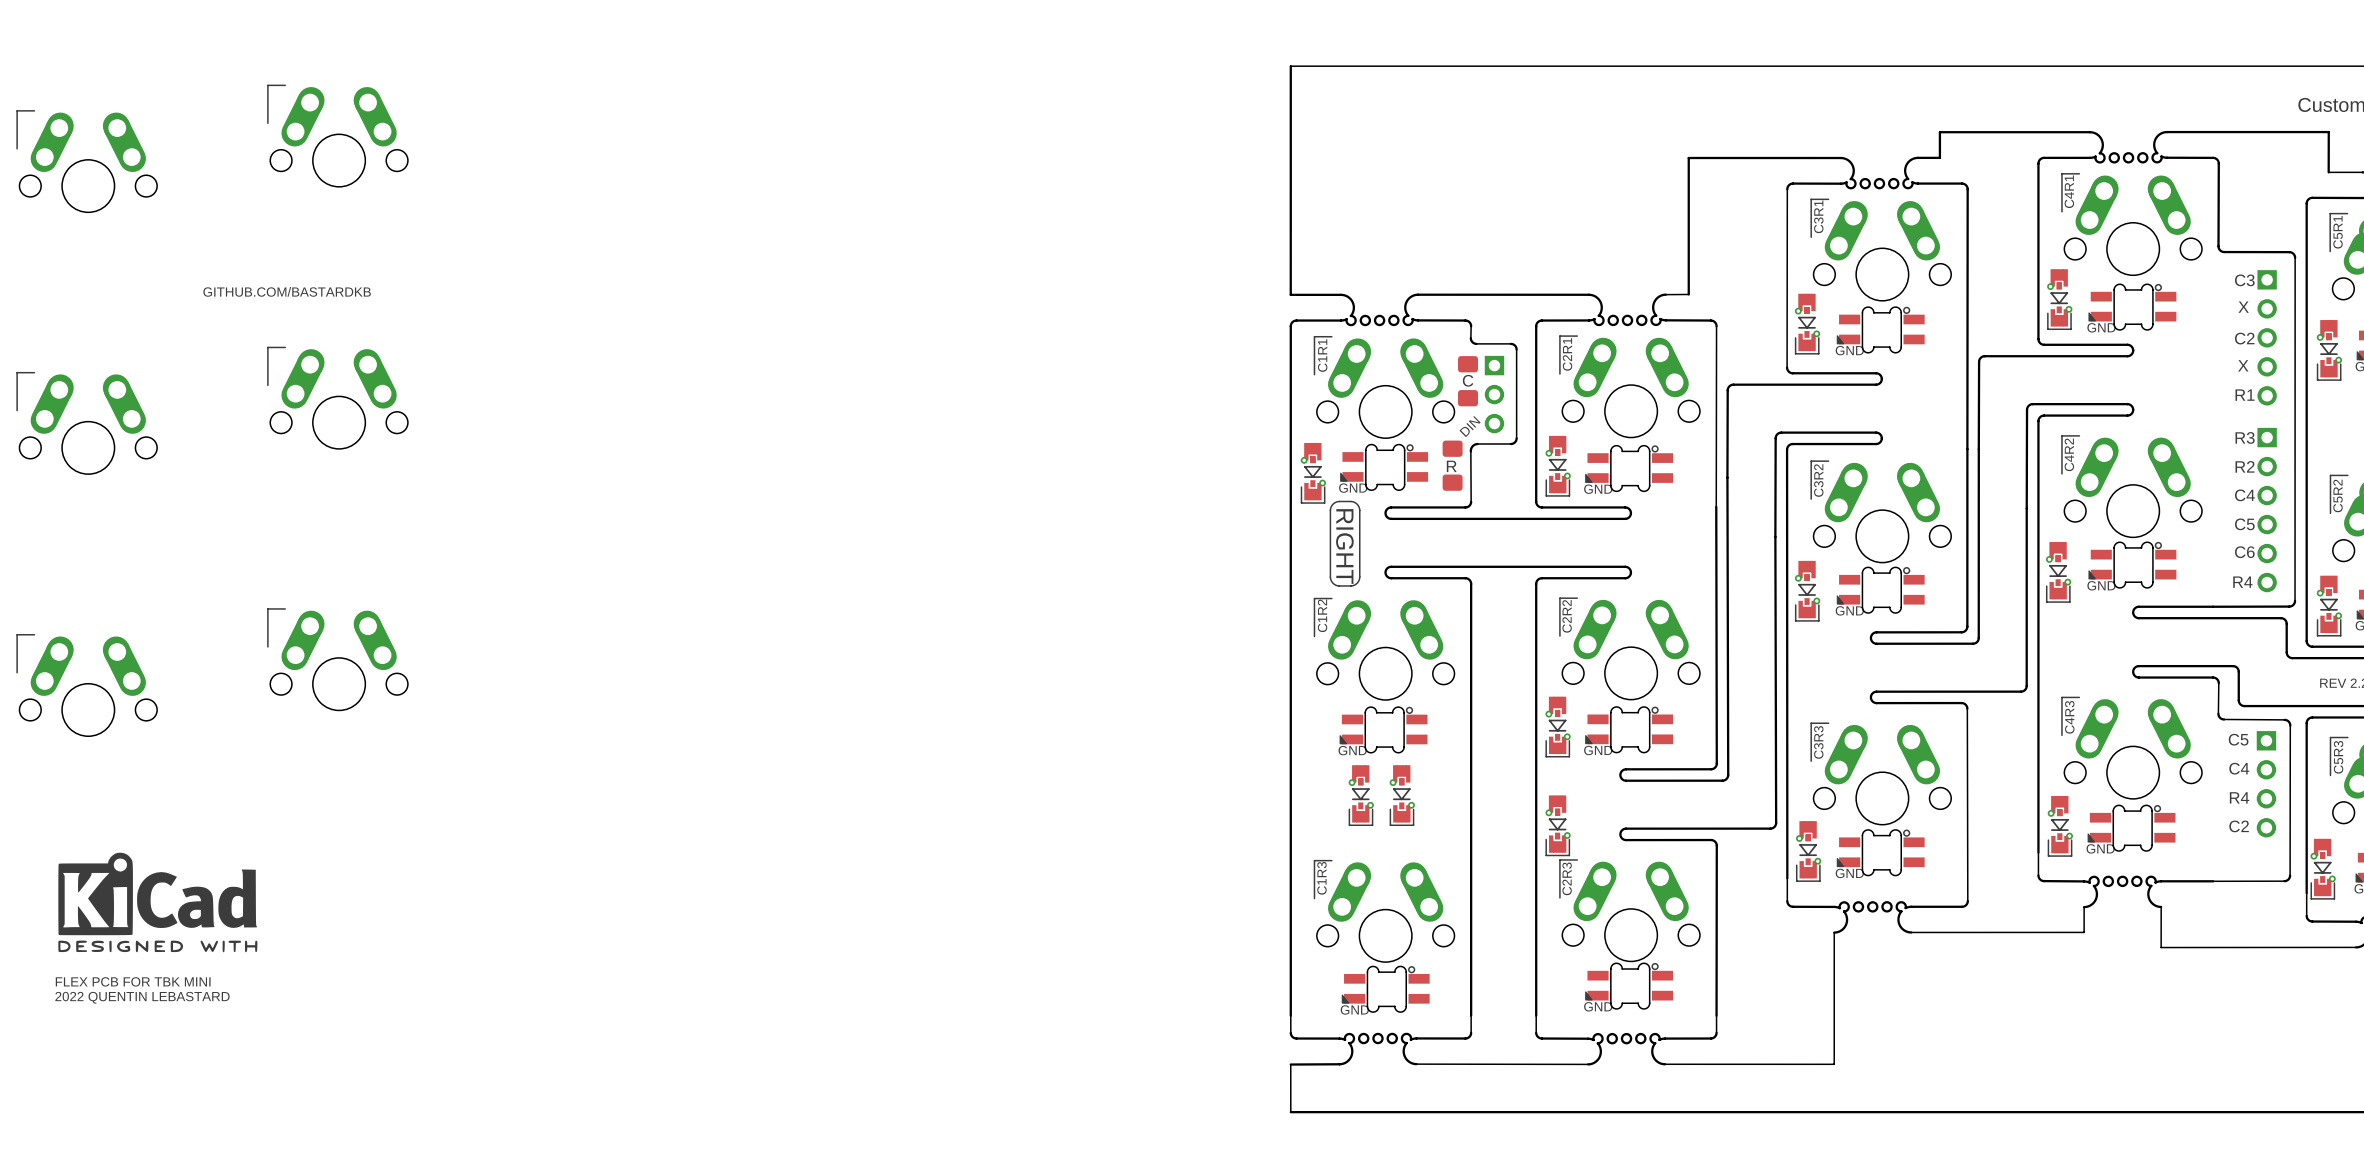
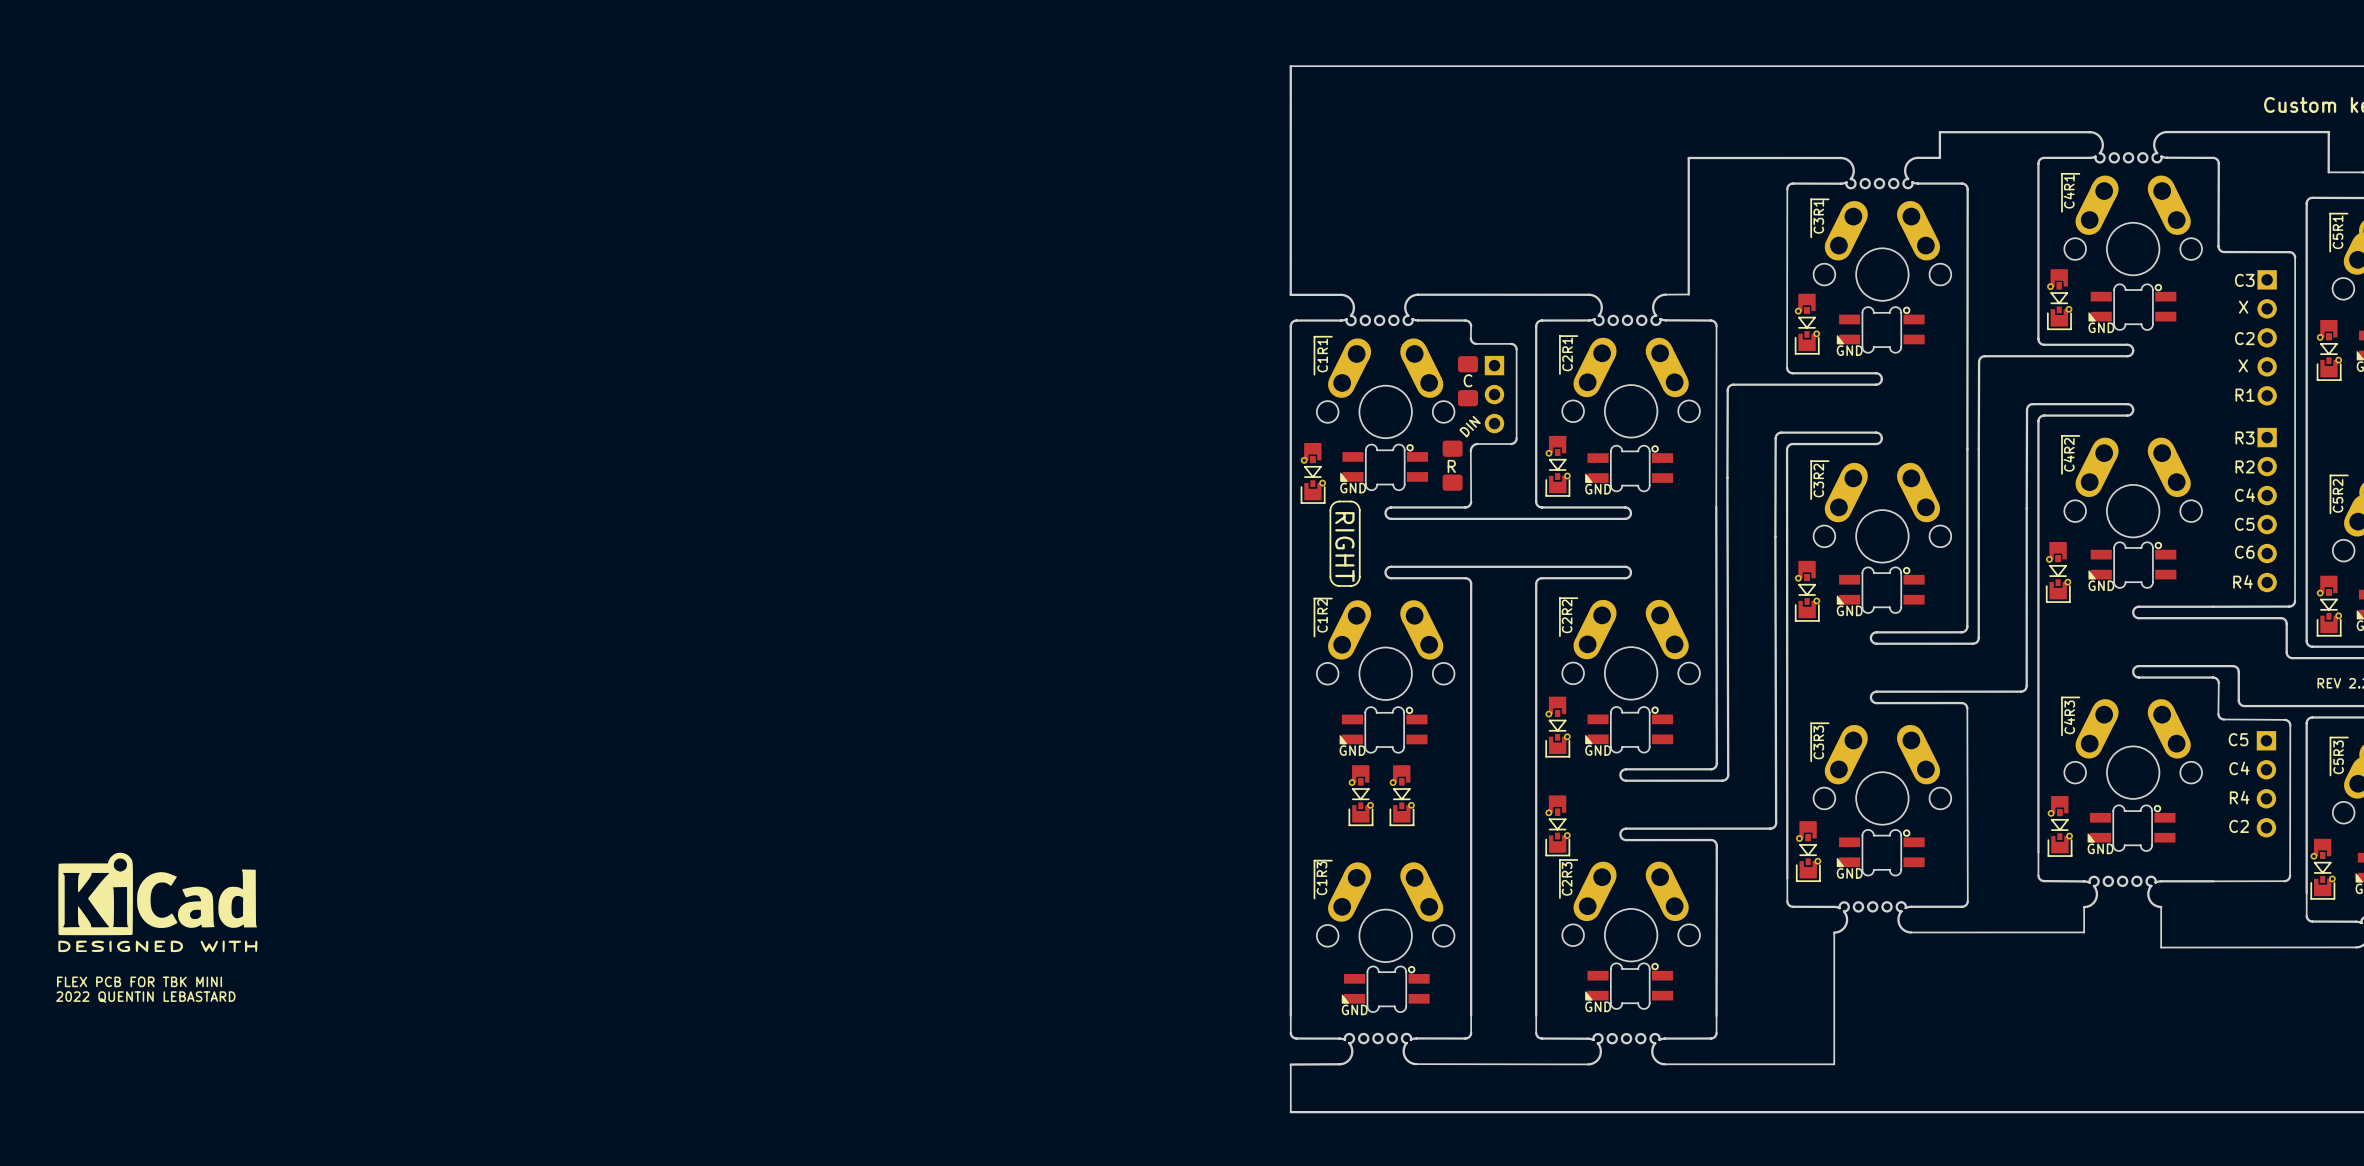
part: (337, 135) -> none
part: (86, 161) -> none
text: GITHUB.COM/BASTARDKB (287, 291) -> none
part: (337, 397) -> none
part: (86, 423) -> none
part: (337, 659) -> none
part: (86, 685) -> none

